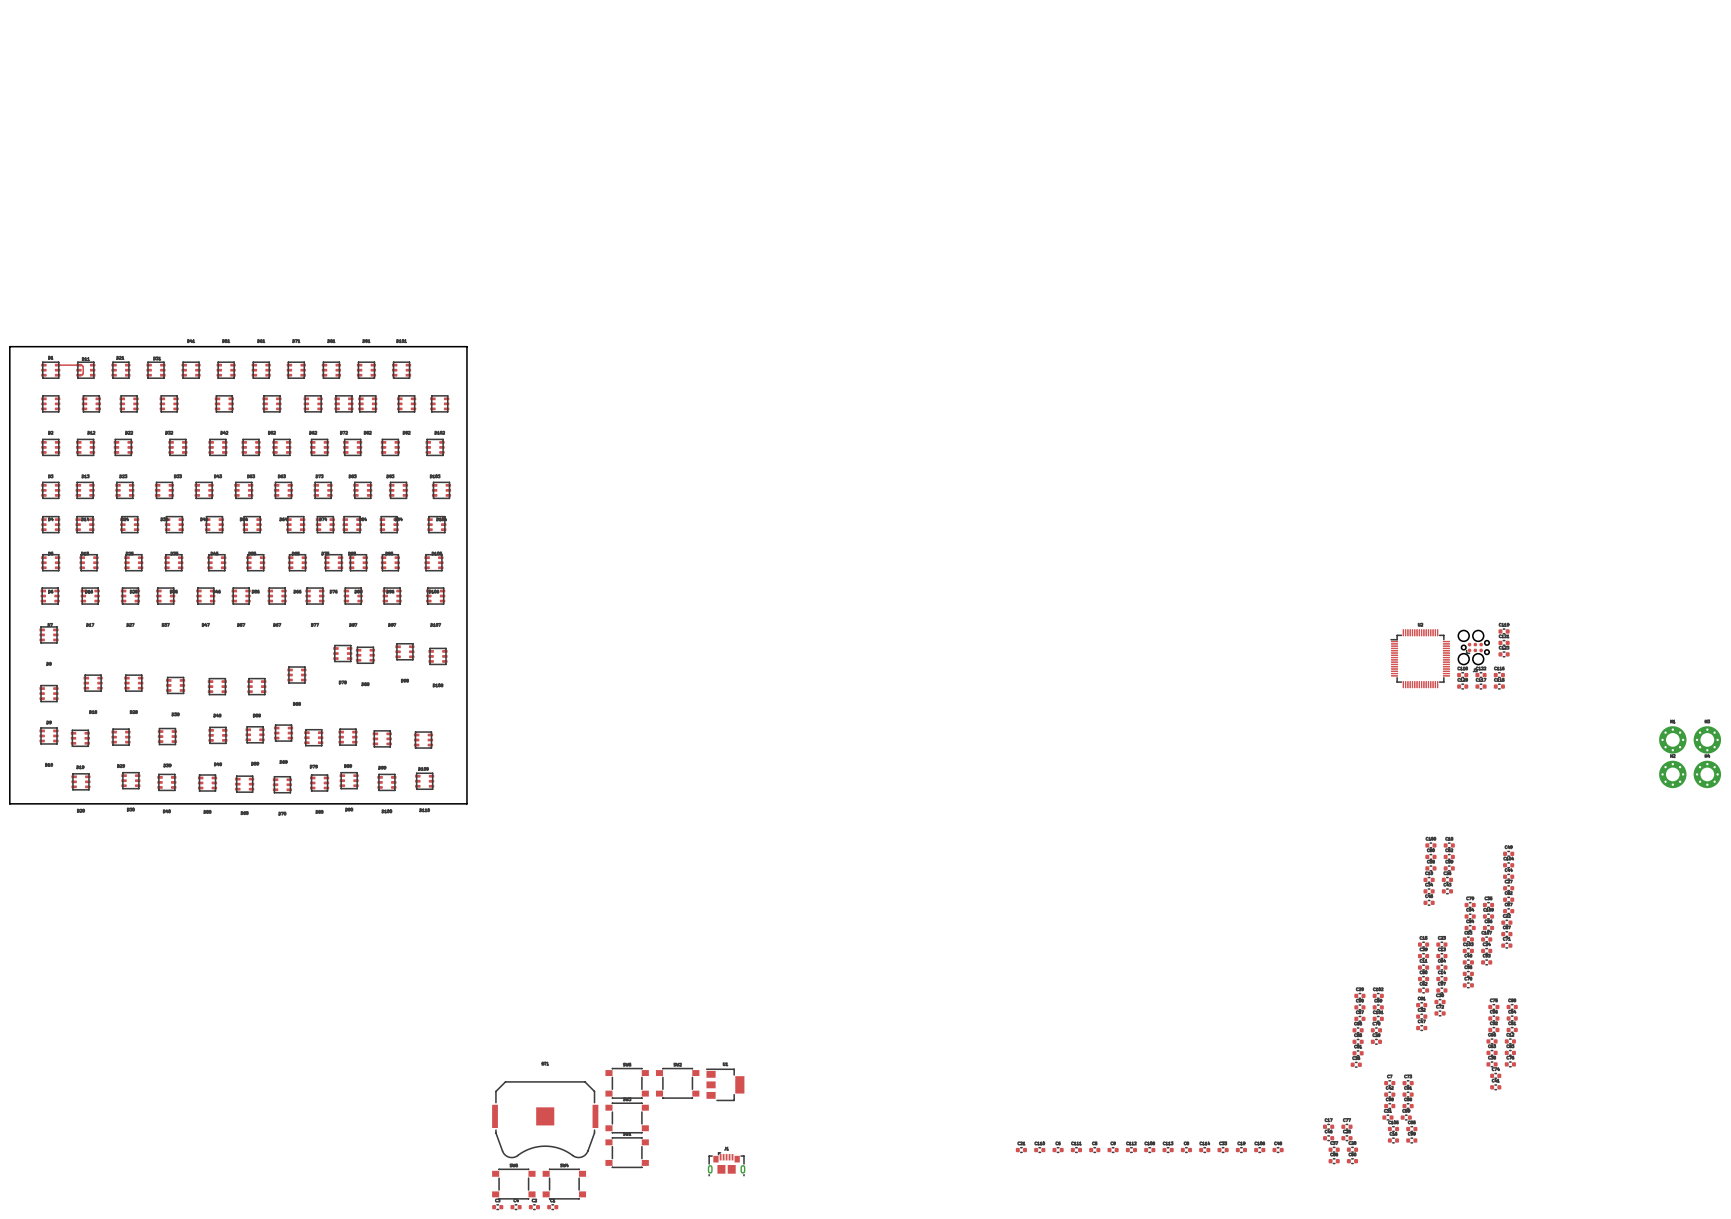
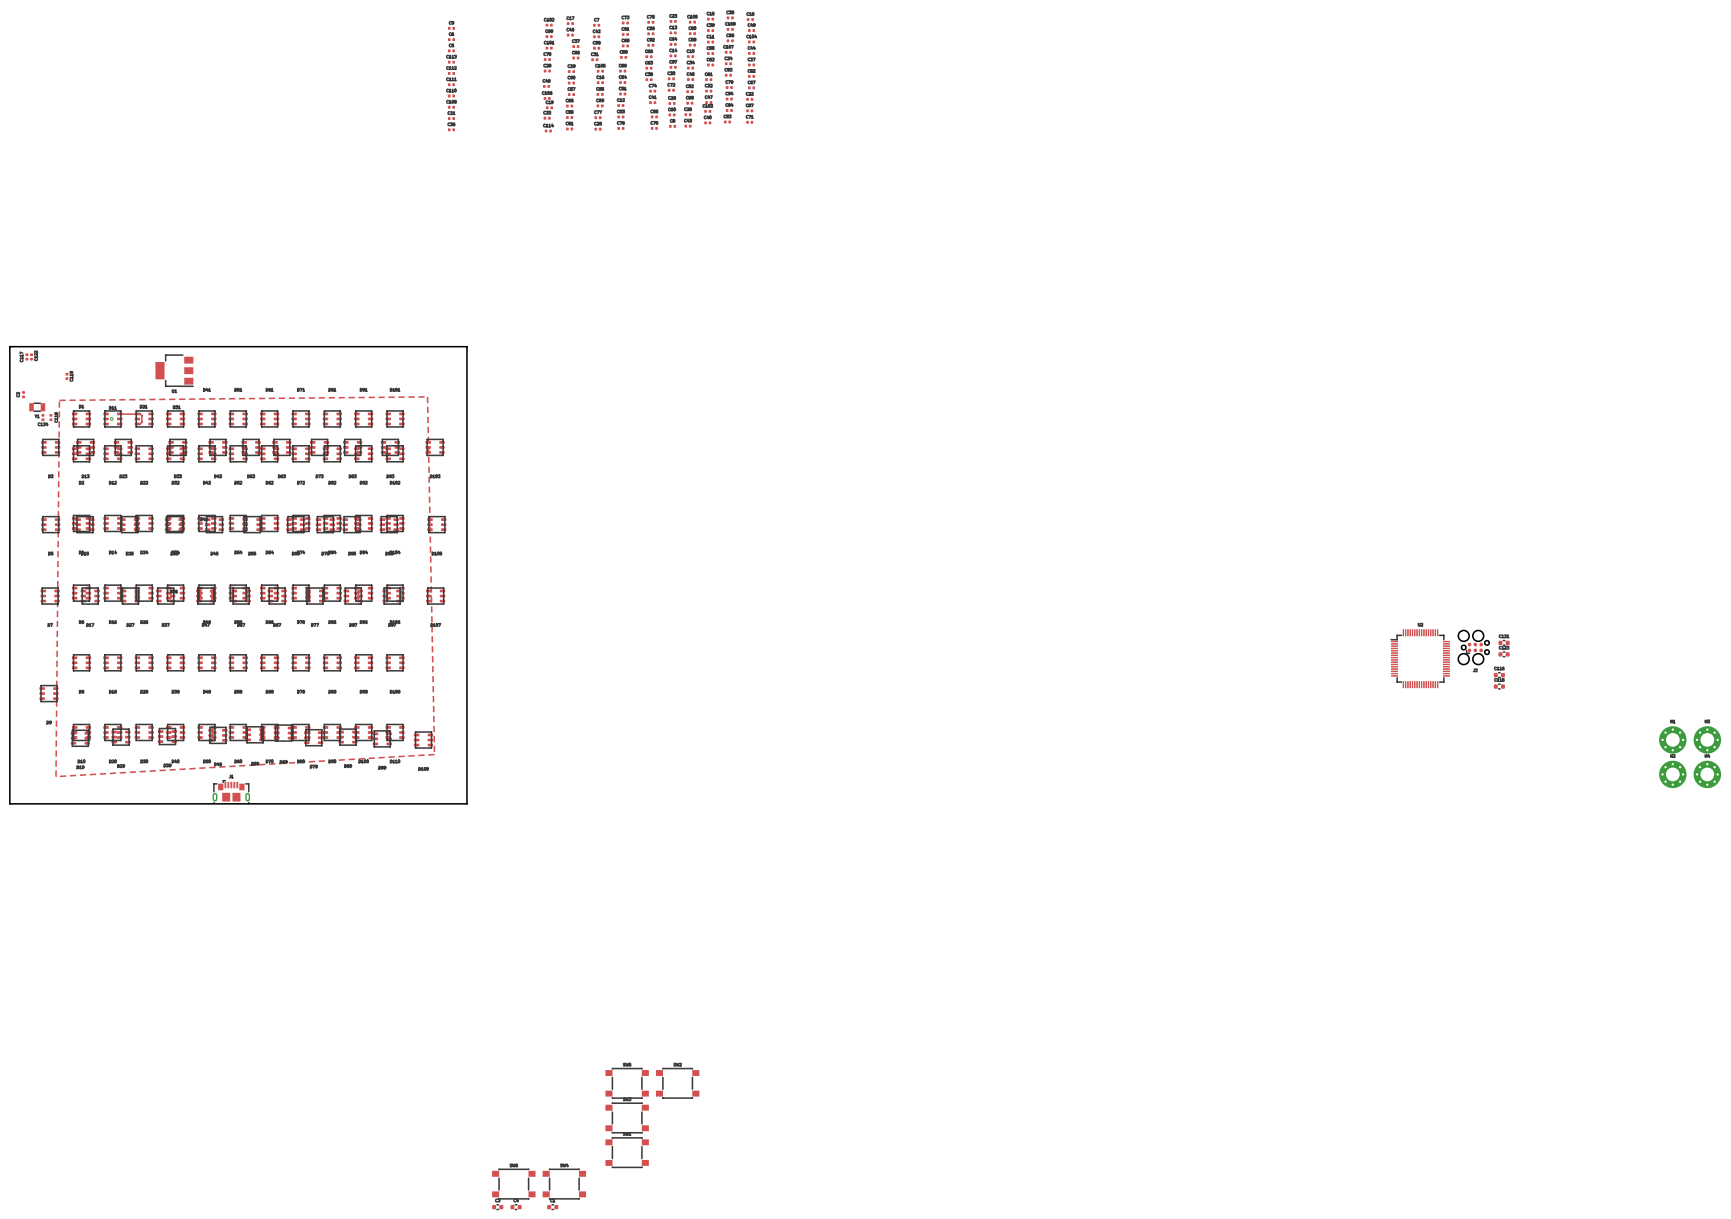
top track: (57, 365) (81, 365) (83, 373) (78, 375) -> none
part position: (50, 370) -> (81, 418)
part position: (85, 370) -> (112, 418)
part position: (120, 370) -> (144, 418)
part position: (155, 370) -> (175, 418)
part position: (191, 370) -> (206, 418)
part position: (226, 370) -> (238, 418)
part position: (261, 370) -> (269, 418)
part position: (296, 370) -> (300, 418)
part position: (331, 370) -> (332, 418)
part position: (366, 370) -> (363, 418)
part position: (401, 370) -> (395, 418)
top zone outline: none -> (427, 396) (59, 400) (55, 776) (434, 754) (427, 396)
part position: (50, 403) -> (81, 453)
part position: (91, 403) -> (112, 453)
part position: (129, 403) -> (144, 453)
part position: (169, 403) -> (175, 453)
part position: (224, 403) -> (206, 453)
part position: (271, 403) -> (238, 453)
part position: (313, 403) -> (269, 453)
part position: (343, 403) -> (300, 453)
part position: (367, 403) -> (332, 453)
part position: (406, 403) -> (363, 453)
part position: (439, 403) -> (395, 453)
part: none -> (37, 407)
top track: none -> (119, 413) (140, 413) (141, 422) (137, 423)
part: none -> (42, 417)
via: none -> (111, 418)
part position: (50, 490) -> (81, 523)
part position: (85, 490) -> (112, 523)
part position: (124, 490) -> (144, 523)
part position: (164, 490) -> (175, 523)
part position: (204, 490) -> (206, 523)
part position: (243, 490) -> (238, 523)
part position: (283, 490) -> (269, 523)
part position: (323, 490) -> (300, 523)
part position: (362, 490) -> (332, 523)
part position: (398, 490) -> (363, 523)
part position: (441, 490) -> (395, 523)
part position: (50, 562) -> (81, 593)
part position: (89, 562) -> (112, 593)
part position: (133, 562) -> (144, 593)
part position: (173, 562) -> (175, 593)
part position: (216, 562) -> (206, 593)
part position: (255, 562) -> (238, 593)
part position: (297, 562) -> (269, 593)
part position: (333, 562) -> (300, 593)
part position: (358, 562) -> (332, 593)
part position: (390, 562) -> (363, 593)
part position: (433, 562) -> (395, 593)
part footprint: [1498, 628, 1510, 635] -> [65, 372, 69, 380]
part position: (49, 634) -> (81, 662)
part position: (404, 651) -> (363, 662)
part position: (342, 653) -> (300, 662)
part position: (365, 655) -> (332, 662)
part position: (438, 656) -> (395, 662)
part footprint: [1457, 672, 1469, 678] -> [49, 413, 53, 422]
part footprint: [1475, 672, 1487, 678] -> [30, 353, 33, 361]
part position: (296, 675) -> (269, 662)
part position: (93, 683) -> (112, 662)
part position: (133, 683) -> (144, 662)
part footprint: [1475, 683, 1487, 690] -> [25, 353, 29, 361]
part position: (175, 685) -> (175, 662)
part position: (217, 686) -> (206, 662)
part position: (256, 686) -> (238, 662)
part: (1462, 686) -> none
part position: (49, 735) -> (81, 732)
part position: (130, 780) -> (144, 732)
part position: (349, 780) -> (332, 732)
part position: (80, 781) -> (112, 732)
part position: (424, 781) -> (395, 732)
part position: (166, 782) -> (175, 732)
part position: (207, 782) -> (206, 732)
part position: (319, 782) -> (300, 732)
part position: (386, 782) -> (363, 732)
part position: (244, 784) -> (238, 732)
part position: (282, 784) -> (269, 732)
part footprint: [1425, 842, 1437, 849] -> [688, 20, 696, 24]
part footprint: [1443, 842, 1455, 849] -> [746, 18, 754, 21]
part footprint: [1503, 851, 1515, 857] -> [747, 29, 756, 32]
part footprint: [1425, 854, 1437, 860] -> [688, 32, 696, 36]
part footprint: [1443, 854, 1455, 860] -> [686, 90, 694, 94]
part footprint: [1503, 862, 1515, 868] -> [747, 40, 756, 44]
part footprint: [1425, 865, 1437, 872] -> [688, 43, 696, 47]
part footprint: [1443, 865, 1455, 872] -> [686, 101, 694, 105]
part footprint: [1503, 874, 1515, 880] -> [747, 51, 756, 55]
part footprint: [1423, 877, 1435, 883] -> [687, 55, 695, 59]
part footprint: [1441, 877, 1454, 883] -> [684, 113, 692, 117]
part footprint: [1503, 885, 1515, 891] -> [747, 63, 756, 67]
part footprint: [1423, 888, 1435, 894] -> [687, 66, 695, 70]
part footprint: [1441, 888, 1454, 894] -> [684, 124, 692, 128]
part footprint: [1503, 897, 1515, 903] -> [747, 74, 756, 78]
part footprint: [1423, 900, 1435, 906] -> [687, 78, 695, 82]
part footprint: [1464, 902, 1476, 908] -> [725, 86, 733, 90]
part footprint: [1482, 902, 1495, 908] -> [726, 16, 734, 20]
part footprint: [1503, 908, 1515, 914] -> [747, 86, 756, 90]
part footprint: [1464, 913, 1476, 920] -> [725, 97, 733, 101]
part footprint: [1482, 913, 1495, 920] -> [726, 27, 734, 31]
part footprint: [1501, 920, 1513, 926] -> [746, 97, 754, 101]
part footprint: [1464, 925, 1476, 931] -> [725, 109, 733, 112]
part footprint: [1482, 925, 1495, 931] -> [726, 39, 734, 43]
part footprint: [1501, 931, 1513, 937] -> [746, 109, 754, 113]
part footprint: [1462, 936, 1474, 943] -> [723, 120, 732, 124]
part footprint: [1481, 936, 1493, 943] -> [724, 50, 732, 54]
part footprint: [1417, 941, 1430, 948] -> [707, 17, 715, 21]
part footprint: [1436, 941, 1448, 948] -> [669, 19, 677, 23]
part footprint: [1501, 942, 1513, 949] -> [746, 120, 754, 124]
part footprint: [1462, 948, 1474, 954] -> [704, 109, 712, 113]
part footprint: [1481, 948, 1493, 954] -> [724, 62, 732, 66]
part footprint: [1417, 953, 1430, 959] -> [707, 29, 715, 33]
part footprint: [1436, 953, 1448, 959] -> [669, 31, 677, 35]
part footprint: [1462, 959, 1474, 966] -> [704, 121, 712, 125]
part footprint: [1481, 959, 1493, 966] -> [724, 73, 732, 77]
part footprint: [1417, 964, 1430, 971] -> [707, 40, 715, 44]
part footprint: [1436, 964, 1448, 971] -> [669, 42, 677, 46]
part footprint: [1462, 971, 1474, 977] -> [650, 115, 658, 119]
part footprint: [1417, 976, 1430, 982] -> [707, 52, 715, 56]
part footprint: [1436, 976, 1448, 982] -> [669, 54, 677, 58]
part footprint: [1462, 982, 1474, 988] -> [650, 126, 658, 130]
part footprint: [1417, 987, 1430, 994] -> [707, 63, 715, 67]
part footprint: [1436, 987, 1448, 994] -> [669, 65, 677, 69]
part footprint: [1354, 993, 1366, 999] -> [567, 70, 576, 74]
part footprint: [1372, 993, 1384, 999] -> [545, 23, 553, 27]
part footprint: [1434, 999, 1446, 1005] -> [667, 77, 675, 81]
part footprint: [1416, 1002, 1428, 1008] -> [705, 78, 713, 82]
part footprint: [1354, 1004, 1366, 1010] -> [567, 81, 576, 85]
part footprint: [1372, 1004, 1384, 1010] -> [545, 35, 553, 39]
part footprint: [1488, 1004, 1500, 1010] -> [647, 20, 655, 24]
part footprint: [1506, 1004, 1518, 1010] -> [619, 69, 627, 73]
part footprint: [1434, 1010, 1446, 1017] -> [667, 88, 675, 92]
part footprint: [1416, 1013, 1428, 1020] -> [705, 89, 713, 93]
part footprint: [1488, 1015, 1500, 1022] -> [647, 32, 655, 36]
part footprint: [1506, 1015, 1518, 1022] -> [619, 81, 627, 85]
part footprint: [1354, 1016, 1366, 1022] -> [567, 93, 576, 97]
part footprint: [1372, 1016, 1384, 1022] -> [545, 46, 553, 50]
part footprint: [1416, 1025, 1428, 1031] -> [705, 101, 713, 105]
part footprint: [1352, 1027, 1364, 1033] -> [566, 104, 574, 108]
part footprint: [1370, 1027, 1383, 1033] -> [543, 58, 551, 62]
part footprint: [1488, 1027, 1500, 1033] -> [647, 43, 655, 47]
part footprint: [1506, 1027, 1518, 1033] -> [619, 92, 627, 96]
part footprint: [1486, 1038, 1498, 1045] -> [645, 55, 653, 59]
part footprint: [1504, 1038, 1516, 1045] -> [617, 104, 625, 107]
part footprint: [1352, 1039, 1364, 1045] -> [566, 116, 574, 119]
part footprint: [1370, 1039, 1383, 1045] -> [543, 69, 551, 73]
part footprint: [1352, 1050, 1364, 1056] -> [566, 127, 574, 131]
part footprint: [1486, 1050, 1498, 1056] -> [645, 66, 653, 70]
part footprint: [1504, 1050, 1516, 1056] -> [617, 115, 625, 119]
part footprint: [1486, 1061, 1498, 1067] -> [645, 78, 653, 82]
part footprint: [1504, 1061, 1516, 1067] -> [617, 126, 625, 130]
part footprint: [1350, 1062, 1362, 1068] -> [447, 128, 456, 132]
part footprint: [1490, 1073, 1502, 1079] -> [649, 89, 657, 93]
part footprint: [1384, 1080, 1396, 1086] -> [593, 23, 601, 27]
part footprint: [1402, 1080, 1414, 1086] -> [621, 21, 630, 25]
part rotation: 0° (725, 1084) -> 180° (174, 370)
part position: (725, 1084) -> (174, 370)
part footprint: [1490, 1084, 1502, 1090] -> [649, 101, 657, 105]
part footprint: [1384, 1092, 1396, 1098] -> [593, 35, 601, 39]
part footprint: [1402, 1092, 1414, 1098] -> [621, 32, 630, 36]
part footprint: [1384, 1103, 1396, 1109] -> [593, 46, 601, 50]
part footprint: [1402, 1103, 1414, 1109] -> [621, 44, 630, 48]
part footprint: [1382, 1114, 1394, 1121] -> [591, 58, 599, 62]
part footprint: [1400, 1114, 1412, 1121] -> [620, 55, 628, 59]
part: (545, 1119) -> none
part footprint: [1323, 1124, 1335, 1130] -> [566, 22, 574, 26]
part footprint: [1341, 1124, 1353, 1130] -> [594, 116, 602, 120]
part footprint: [1387, 1126, 1400, 1132] -> [596, 69, 604, 73]
part footprint: [1406, 1126, 1418, 1132] -> [596, 92, 604, 96]
part footprint: [1323, 1135, 1335, 1141] -> [566, 33, 574, 37]
part footprint: [1341, 1135, 1353, 1141] -> [594, 127, 602, 131]
part footprint: [1387, 1137, 1400, 1144] -> [596, 81, 604, 85]
part footprint: [1406, 1137, 1418, 1144] -> [596, 104, 604, 108]
part footprint: [1015, 1147, 1028, 1153] -> [447, 117, 456, 121]
part footprint: [1034, 1147, 1046, 1153] -> [447, 94, 456, 98]
part footprint: [1052, 1147, 1064, 1153] -> [447, 38, 456, 42]
part footprint: [1070, 1147, 1083, 1153] -> [447, 83, 456, 87]
part footprint: [1089, 1147, 1101, 1153] -> [447, 49, 456, 53]
part footprint: [1107, 1147, 1119, 1153] -> [447, 26, 456, 30]
part footprint: [1125, 1147, 1138, 1153] -> [447, 71, 456, 75]
part footprint: [1144, 1147, 1156, 1153] -> [447, 105, 456, 109]
part footprint: [1162, 1147, 1174, 1153] -> [447, 60, 456, 64]
part footprint: [1180, 1147, 1193, 1153] -> [669, 124, 677, 128]
part footprint: [1199, 1147, 1211, 1153] -> [544, 129, 552, 133]
part footprint: [1217, 1147, 1229, 1153] -> [543, 116, 551, 120]
part footprint: [1235, 1147, 1248, 1153] -> [545, 106, 554, 110]
part footprint: [1254, 1147, 1266, 1153] -> [543, 97, 551, 100]
part footprint: [1272, 1147, 1284, 1153] -> [542, 84, 551, 88]
part footprint: [1328, 1147, 1340, 1153] -> [572, 45, 580, 49]
part footprint: [1346, 1147, 1359, 1153] -> [668, 102, 676, 105]
part footprint: [1328, 1158, 1340, 1164] -> [572, 56, 580, 60]
part footprint: [1346, 1158, 1359, 1164] -> [668, 113, 676, 117]
part position: (726, 1164) -> (231, 792)
part footprint: [528, 1204, 540, 1210] -> [22, 391, 25, 399]

